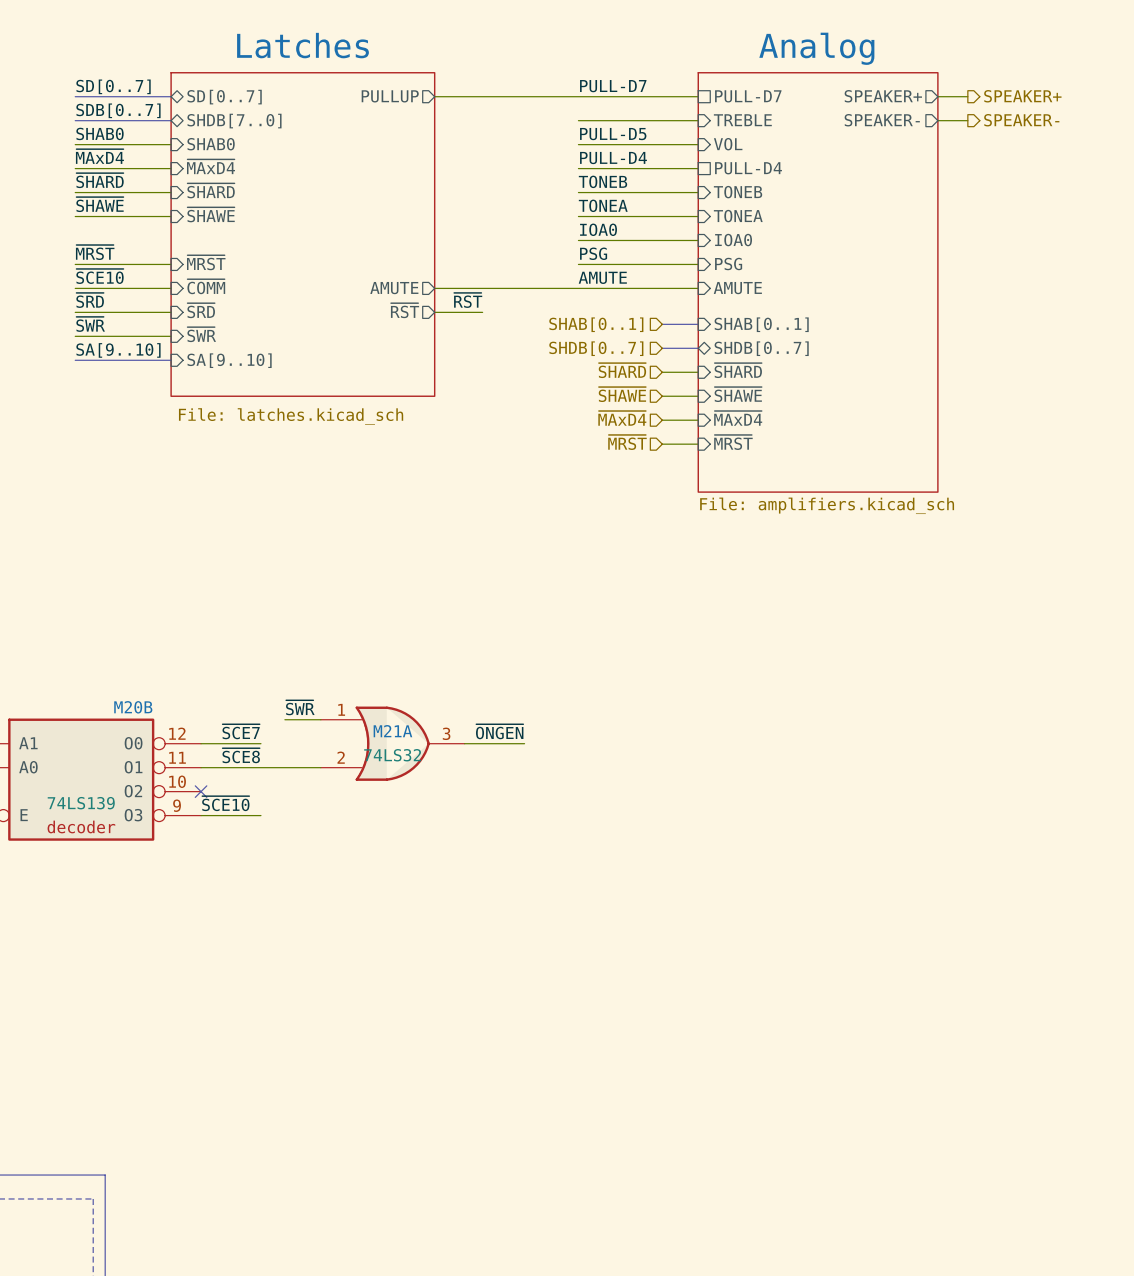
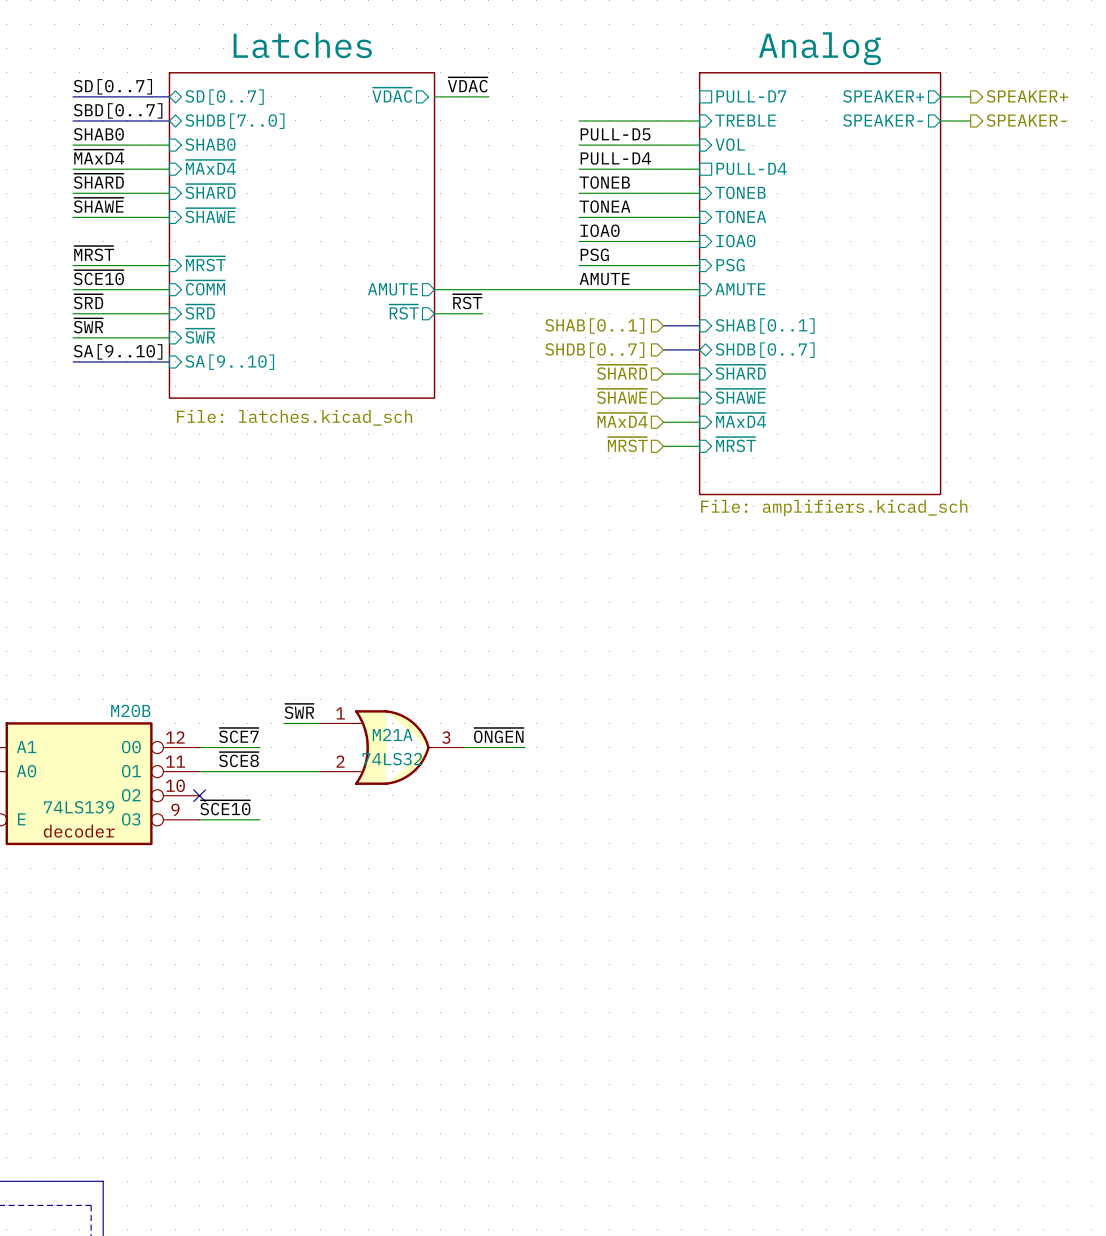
label: none -> ~{VDAC} (467, 84)
label: PULL-D7 (613, 86) -> none
sheet pin: PULLUP (390, 96) -> ~{VDAC} (392, 95)
wire: (488, 96) (698, 96) -> none
label: SDB[0..7] (118, 110) -> SBD[0..7] (118, 110)

